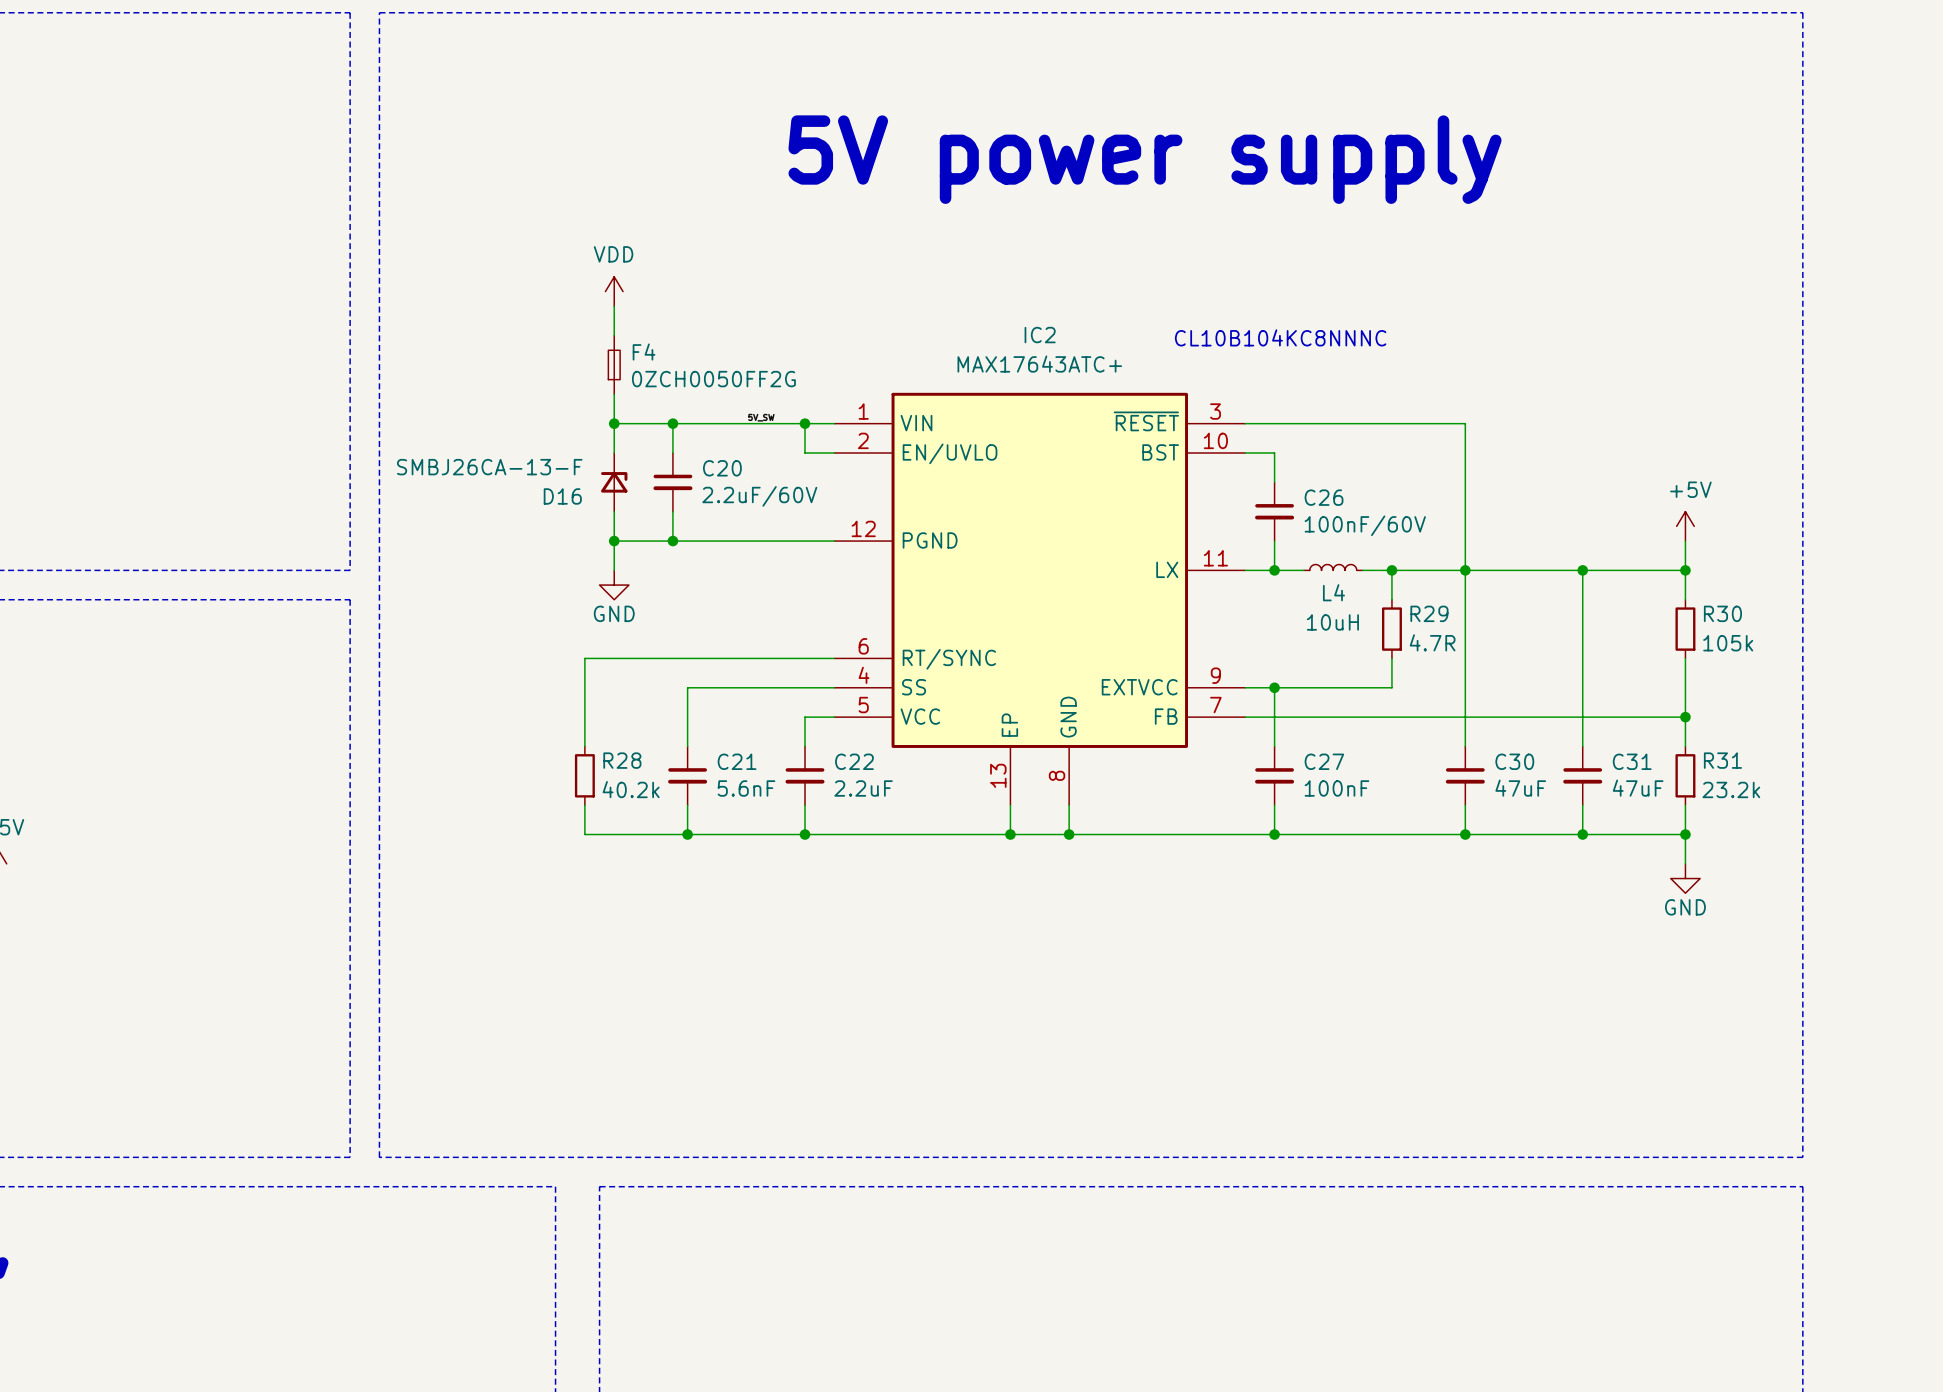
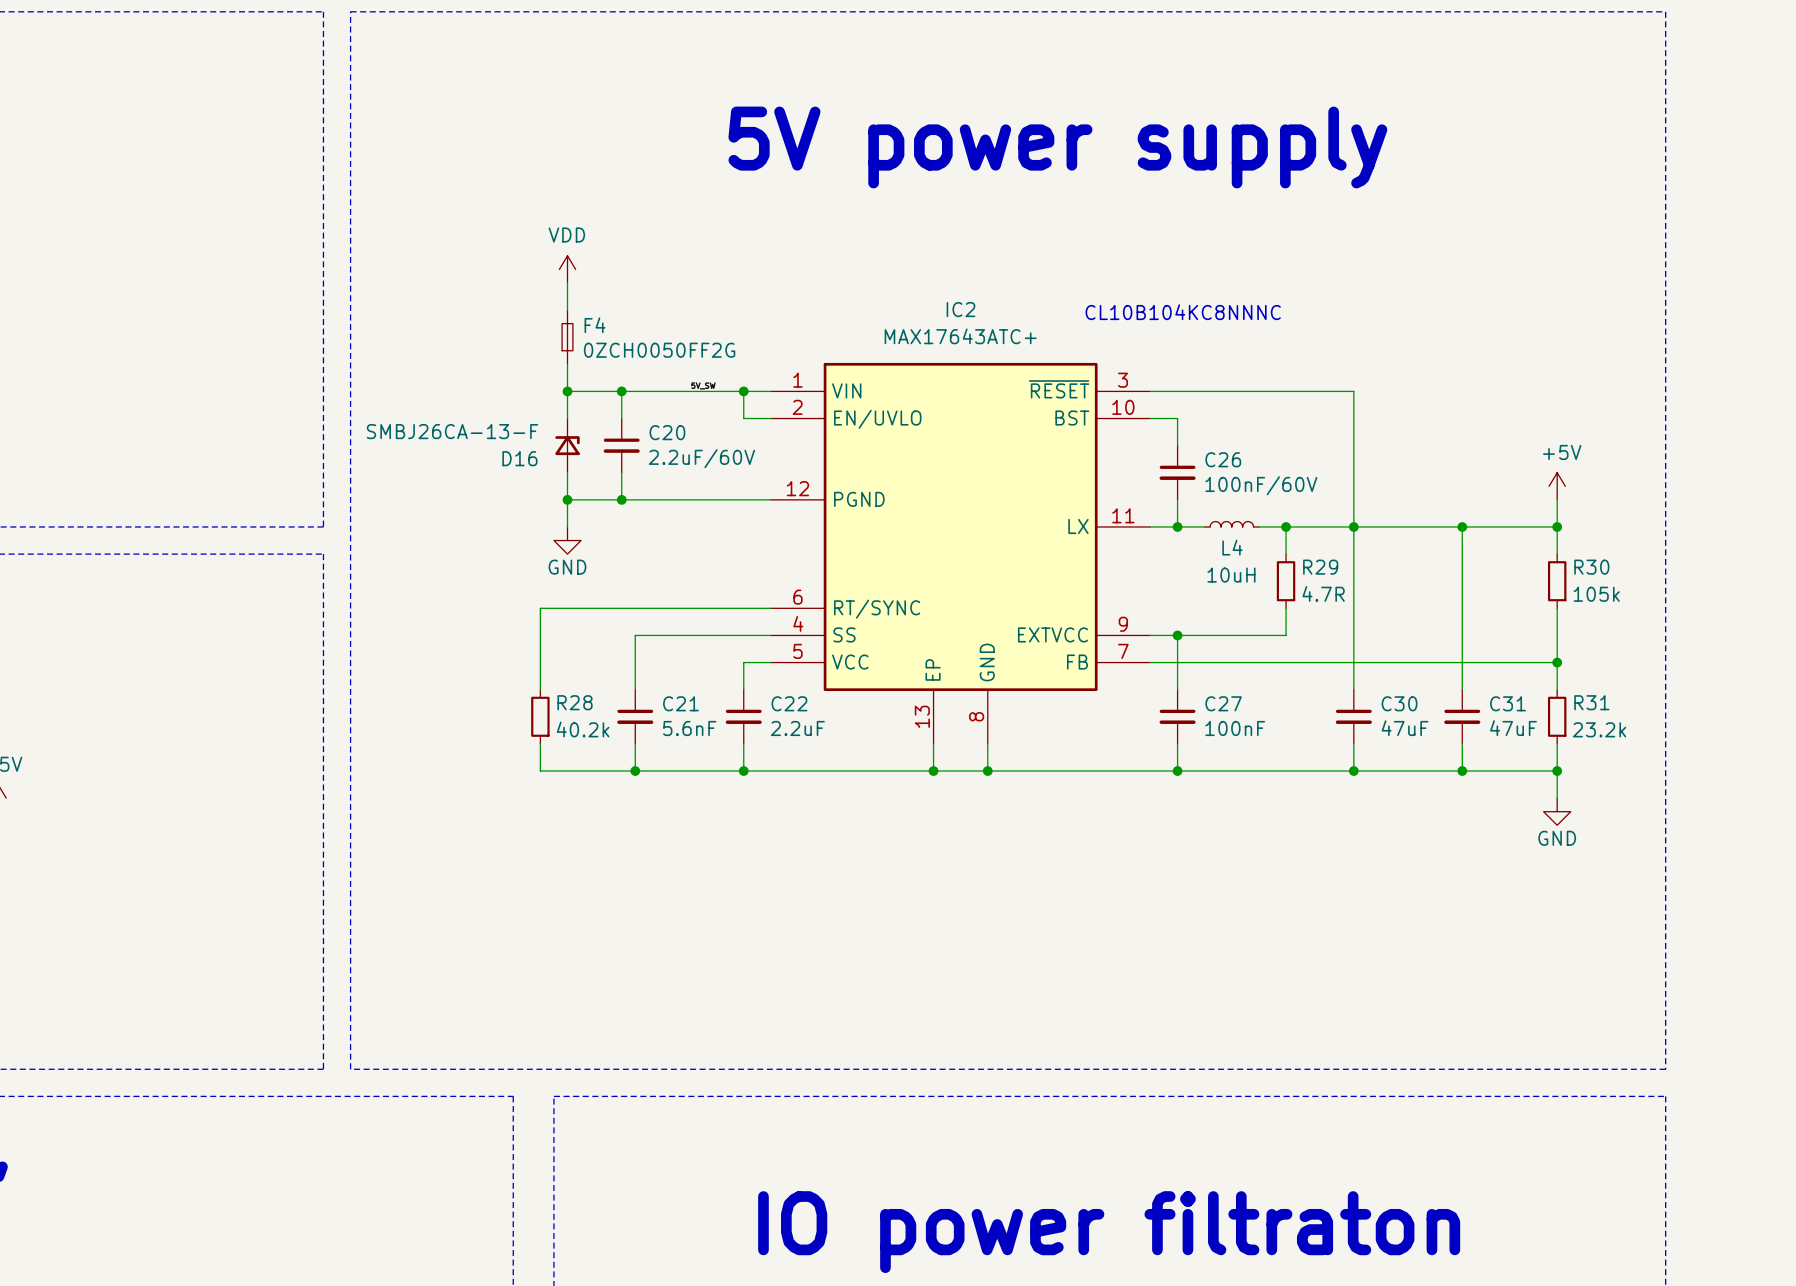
text: none -> IO power filtraton (1109, 1232)

